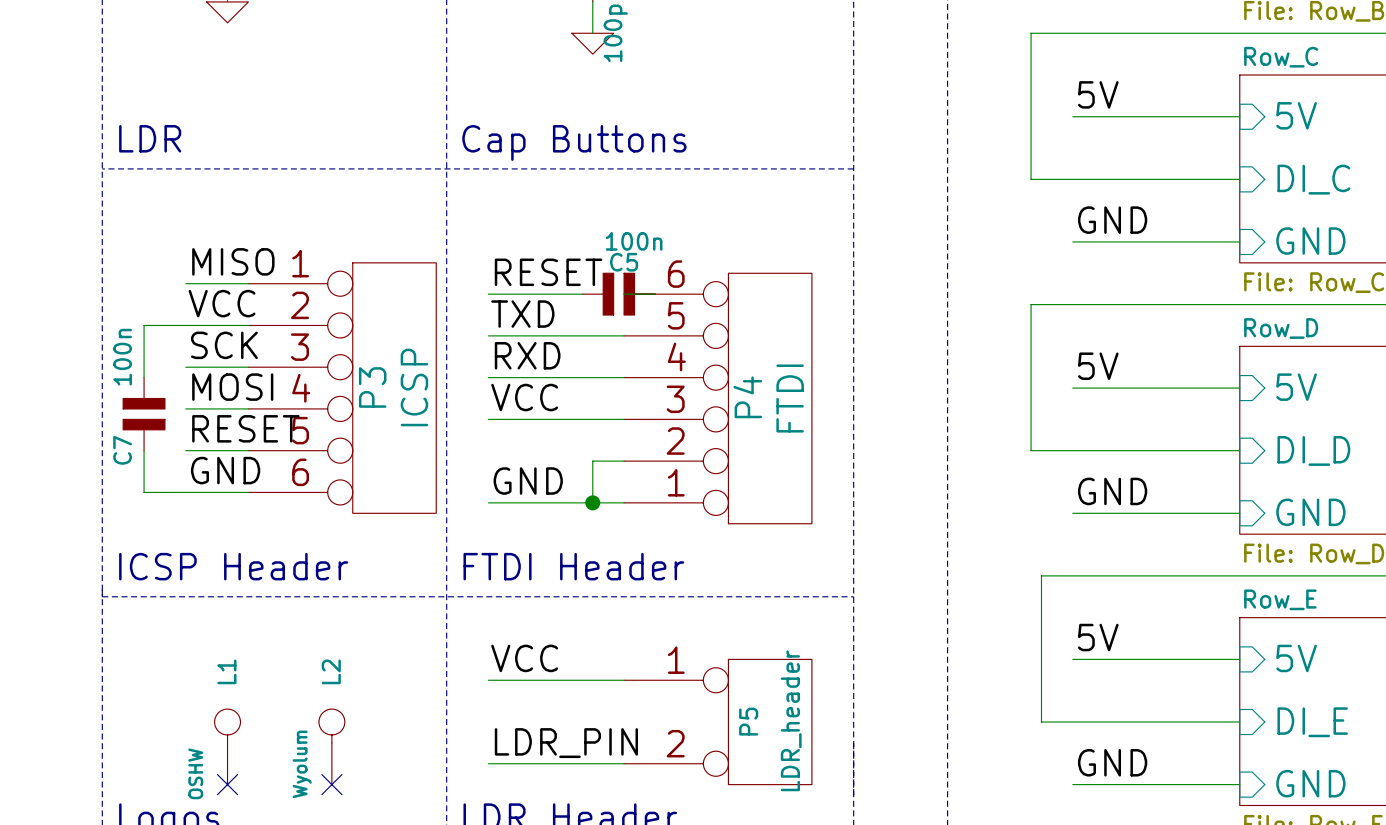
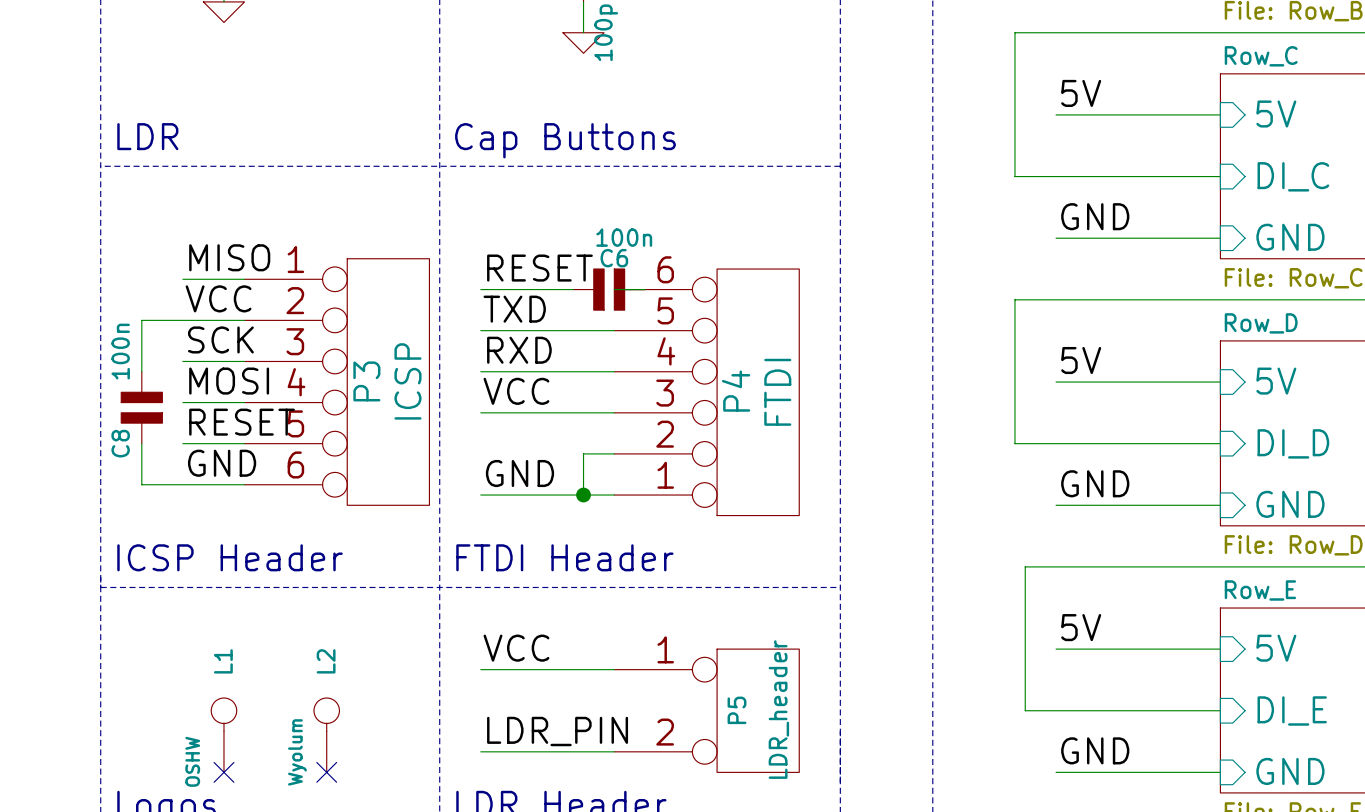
C5 name: C5 (624, 262) -> C6 (614, 258)
C7 name: C7 (122, 450) -> C8 (120, 443)

